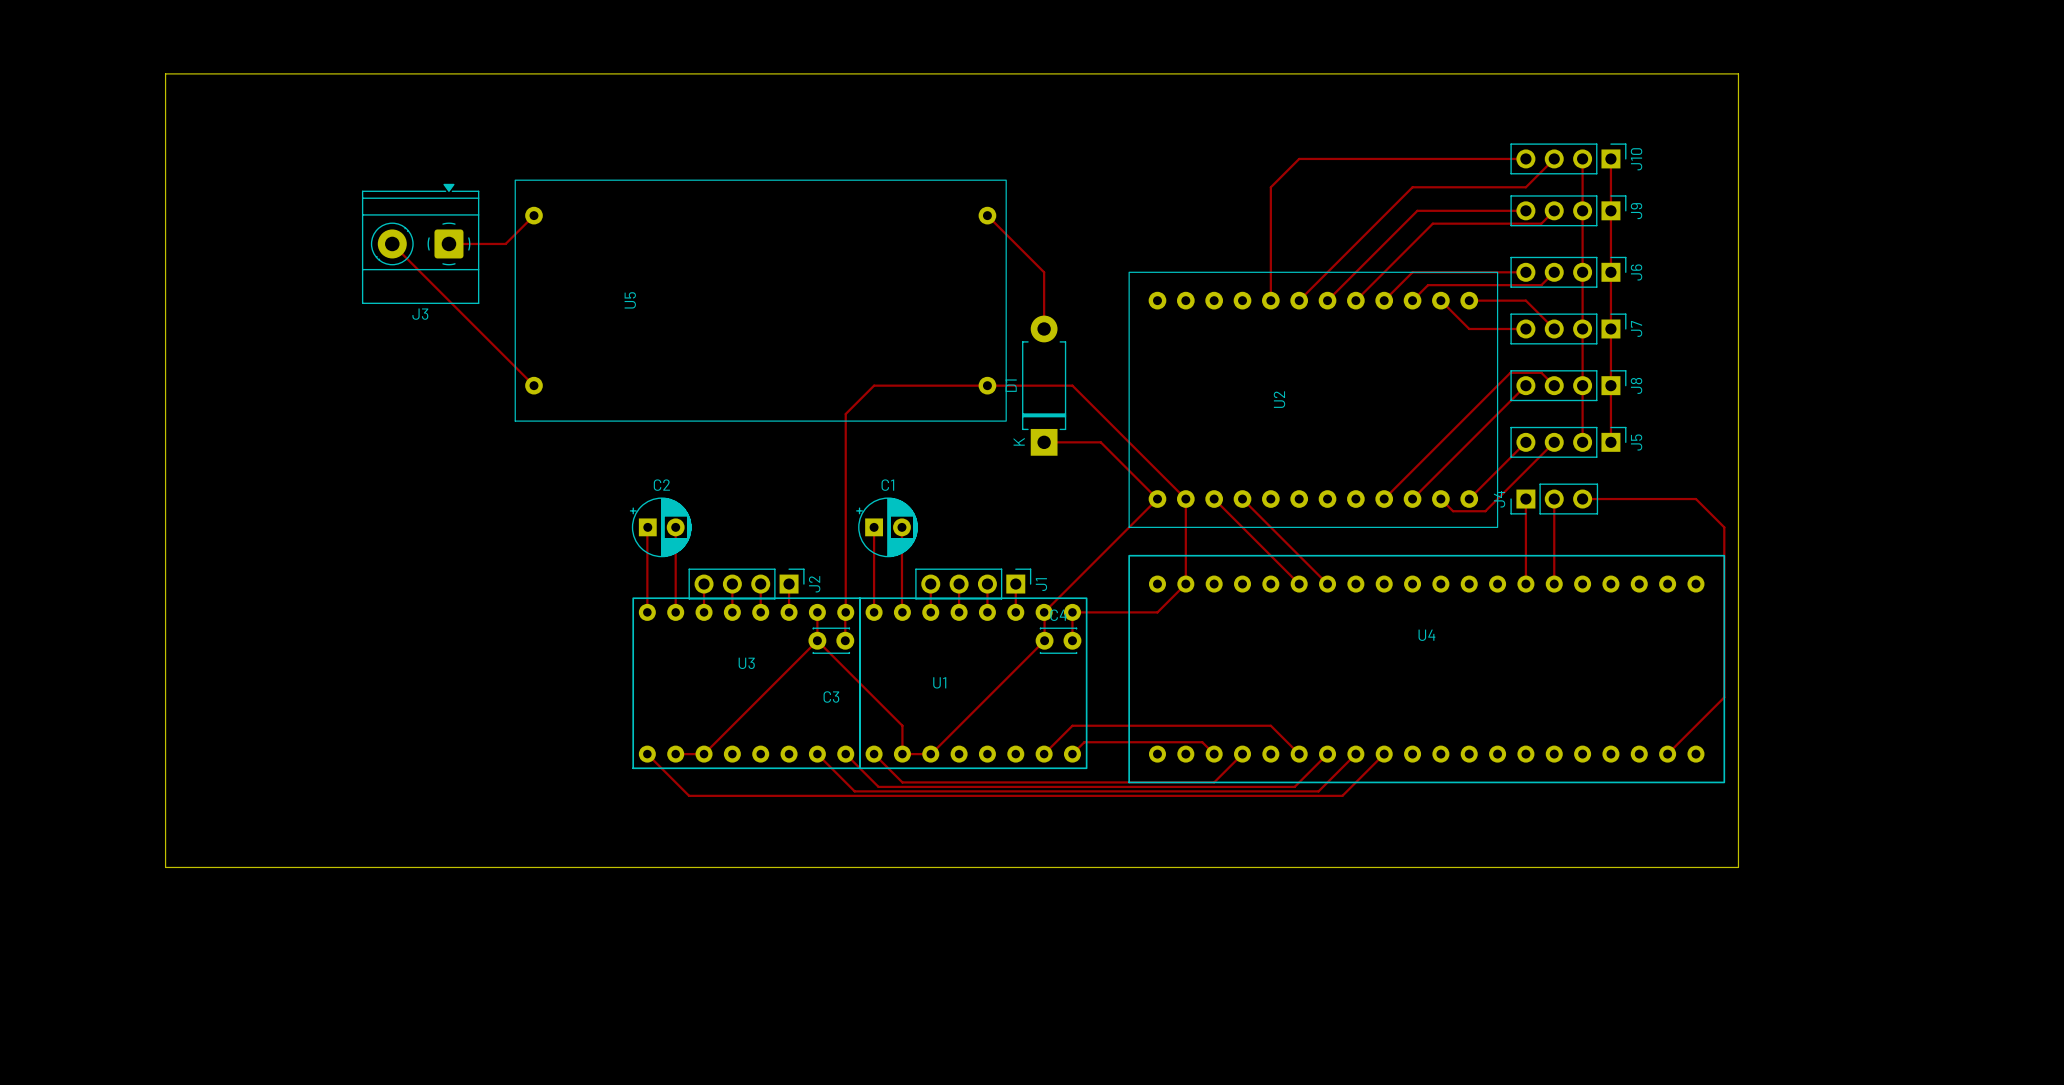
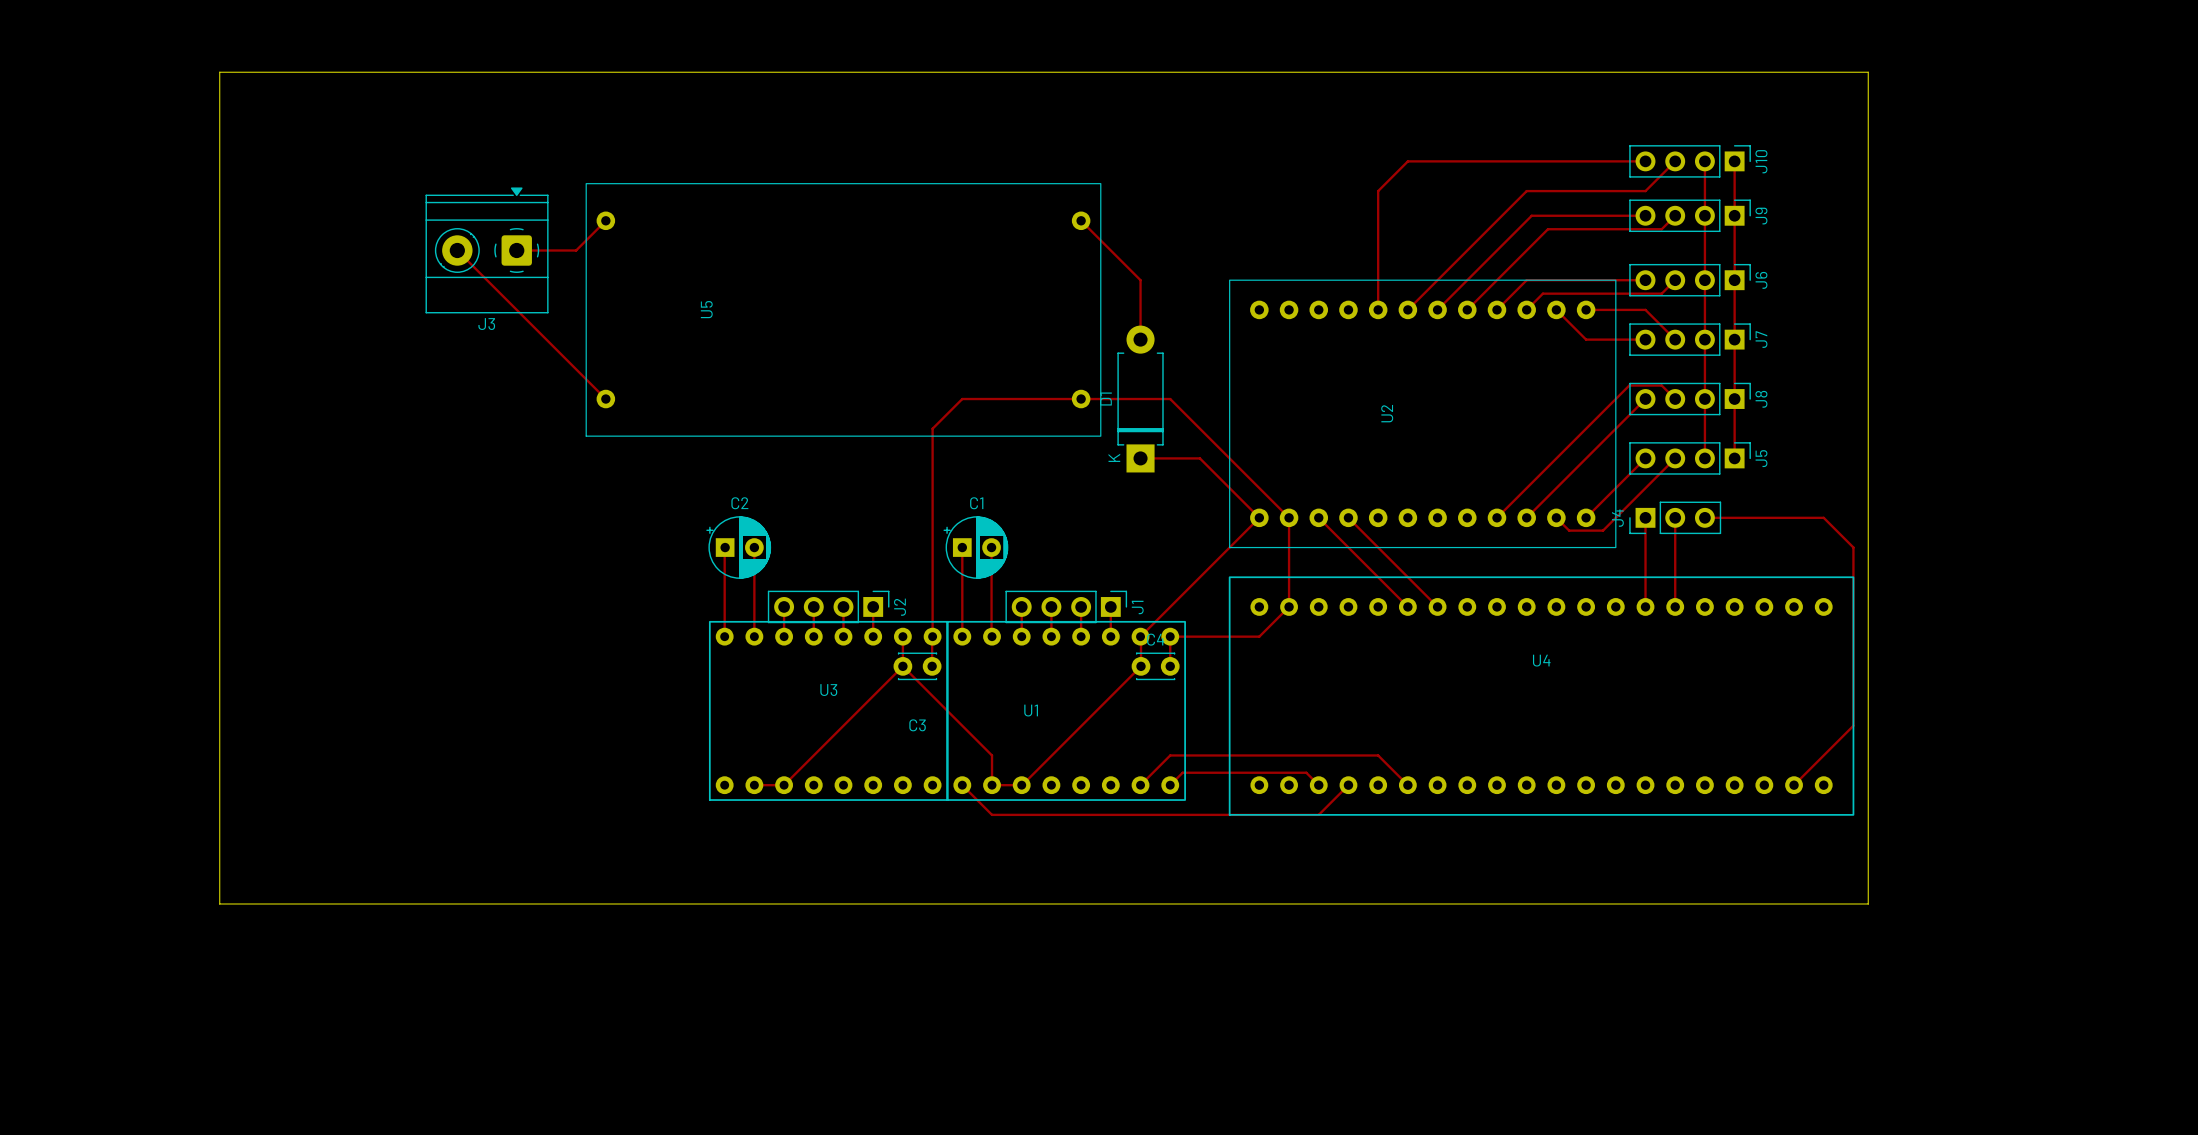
track: (647, 754) (689, 795) (1342, 795) (1384, 754) -> none
track: (817, 754) (854, 791) (1318, 791) (1355, 754) -> none
track: (845, 754) (878, 786) (1294, 786) (1327, 754) -> none

